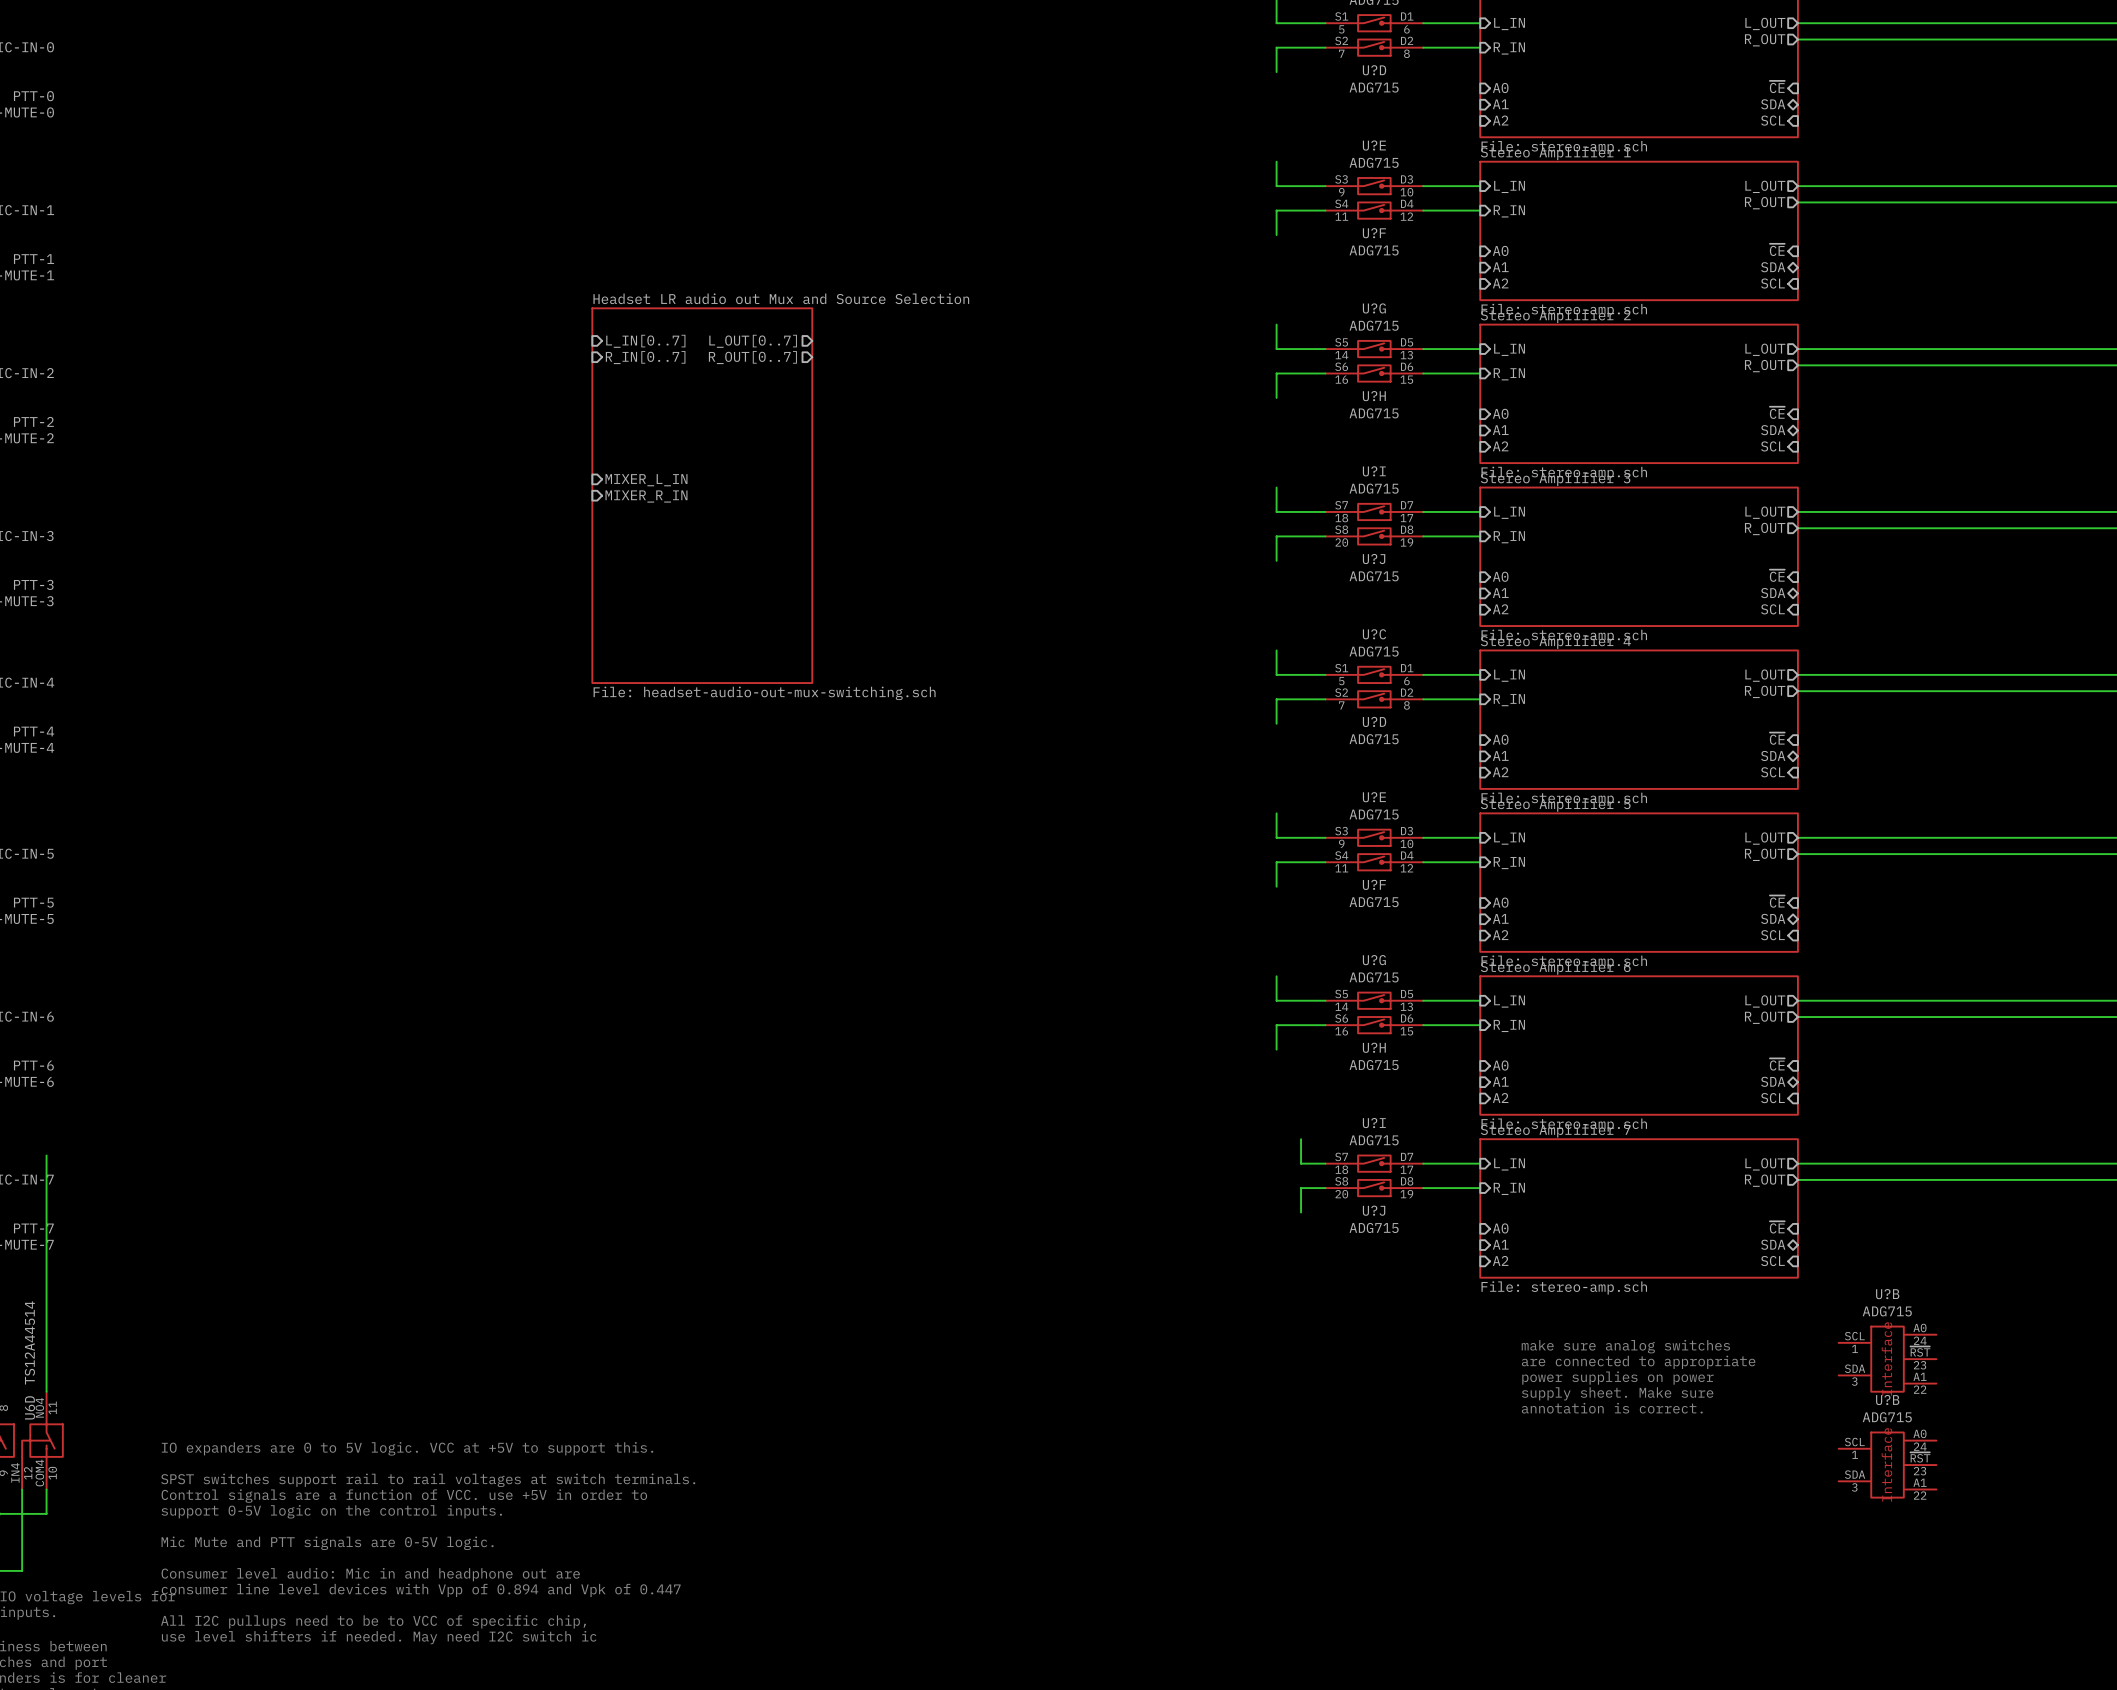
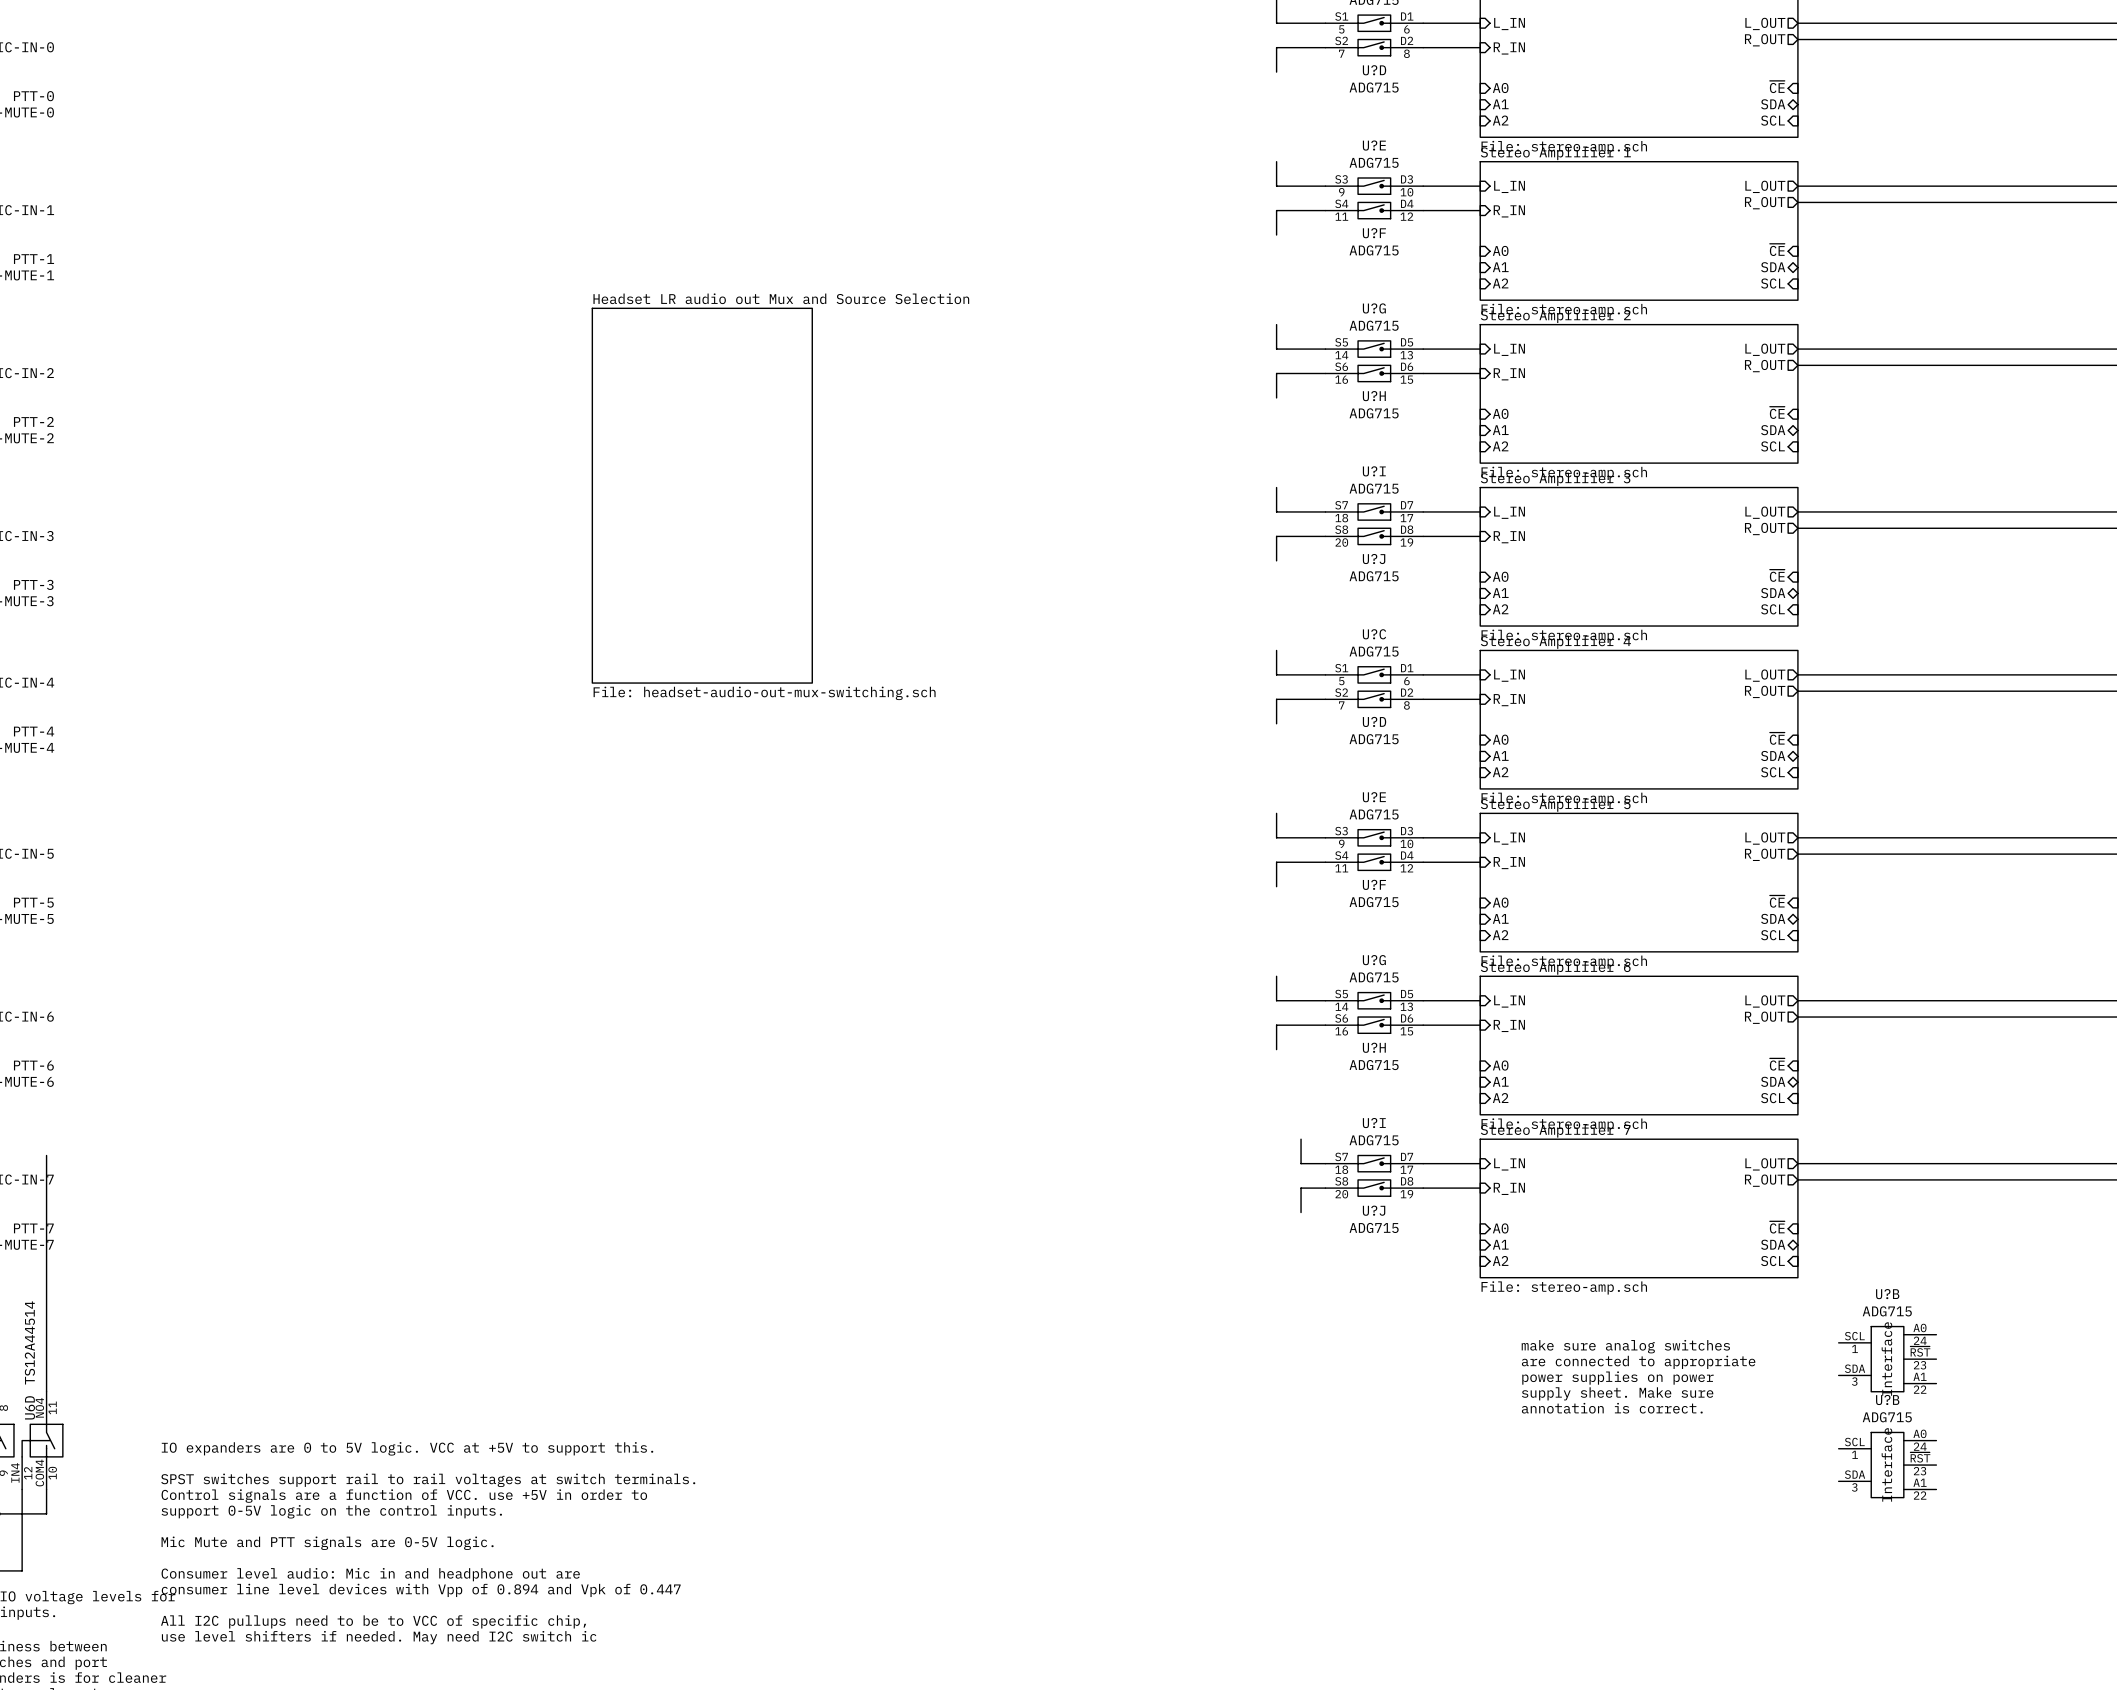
sheet pin: L_IN[0..7] (645, 341) -> none
sheet pin: L_OUT[0..7] (753, 341) -> none
sheet pin: R_IN[0..7] (645, 357) -> none
sheet pin: R_OUT[0..7] (752, 357) -> none
sheet pin: MIXER_L_IN (646, 480) -> none
sheet pin: MIXER_R_IN (646, 496) -> none

